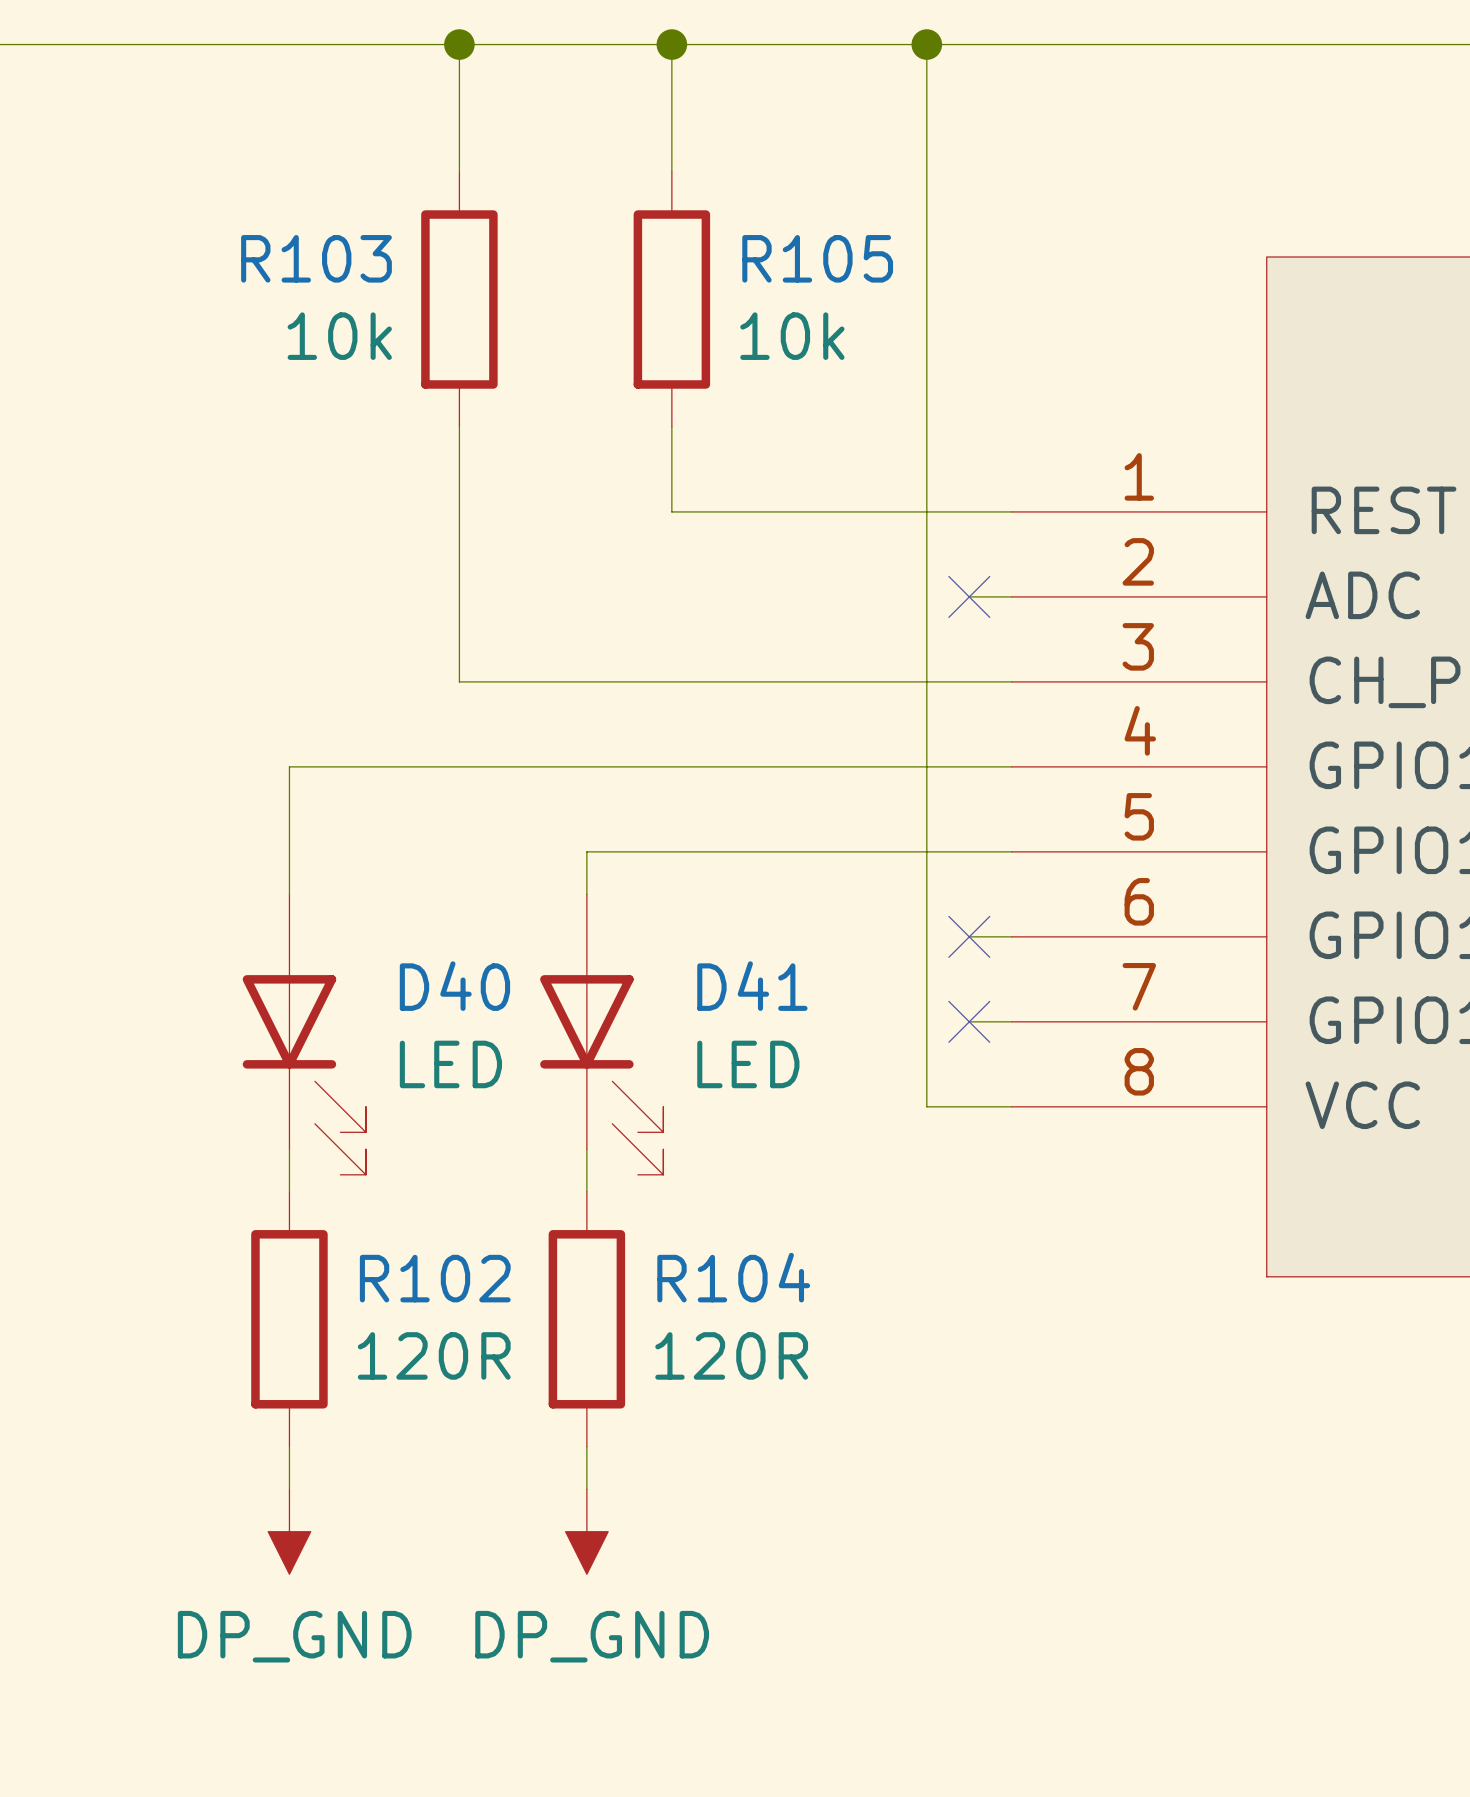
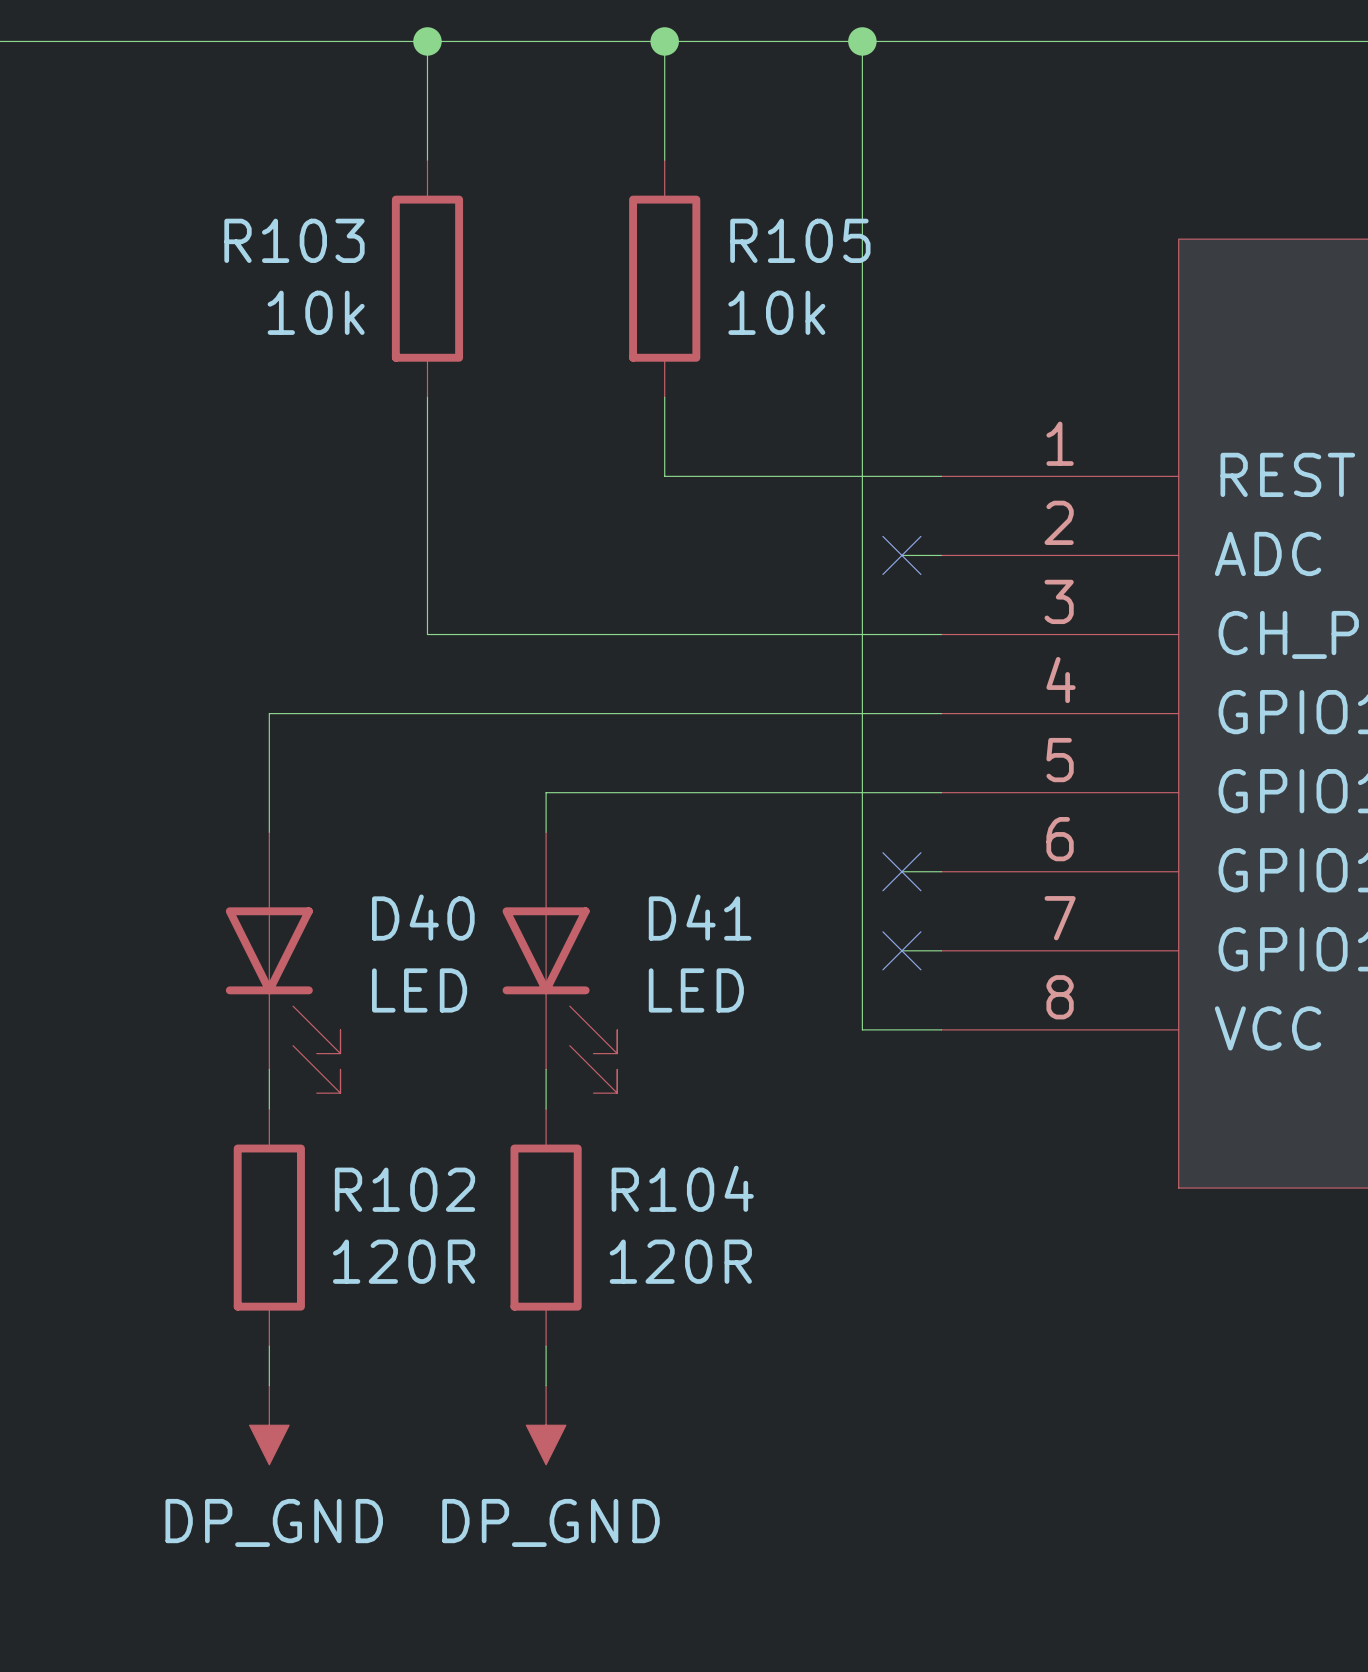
wire: (671, 44) (671, 172) -> (664, 41) (664, 160)
junction position: (671, 44) -> (664, 41)
R105 position: (671, 299) -> (664, 278)
wire: (671, 426) (671, 511) (714, 511) -> (664, 397) (664, 476)

